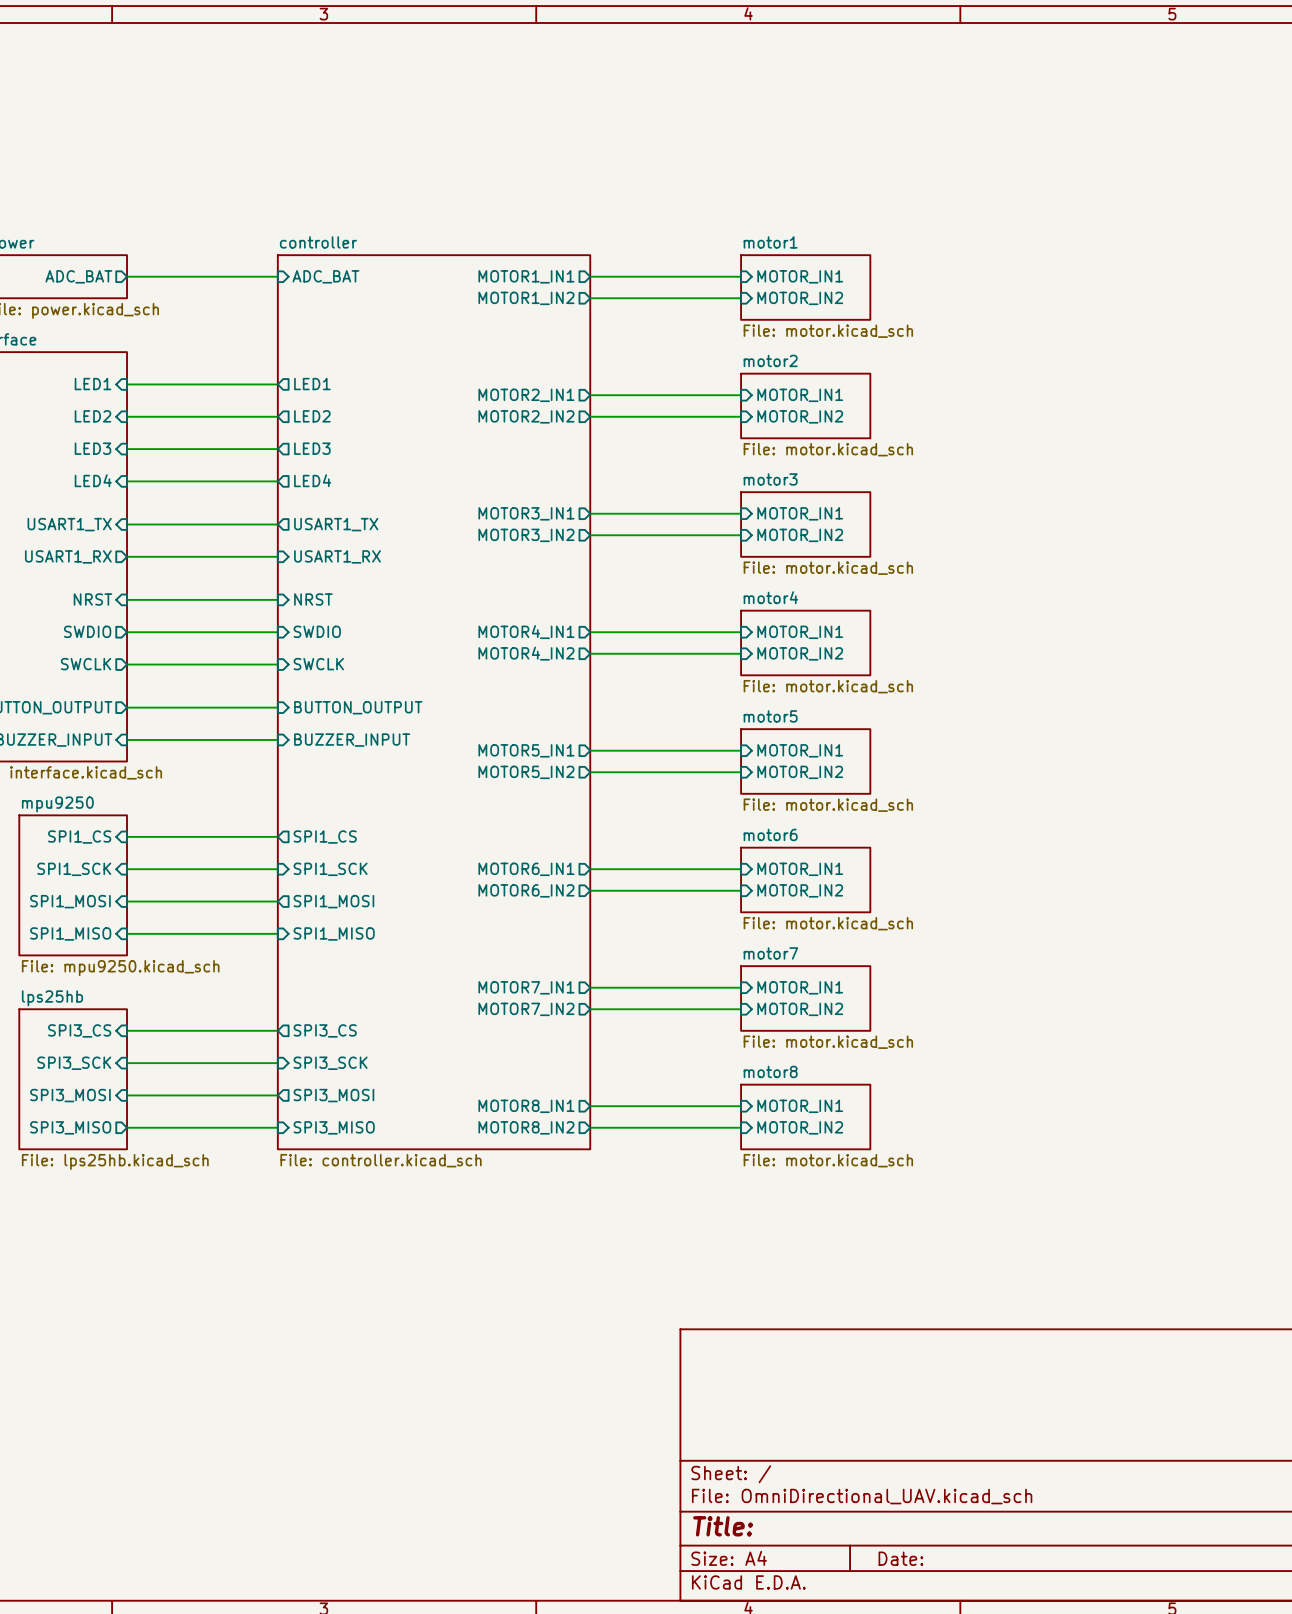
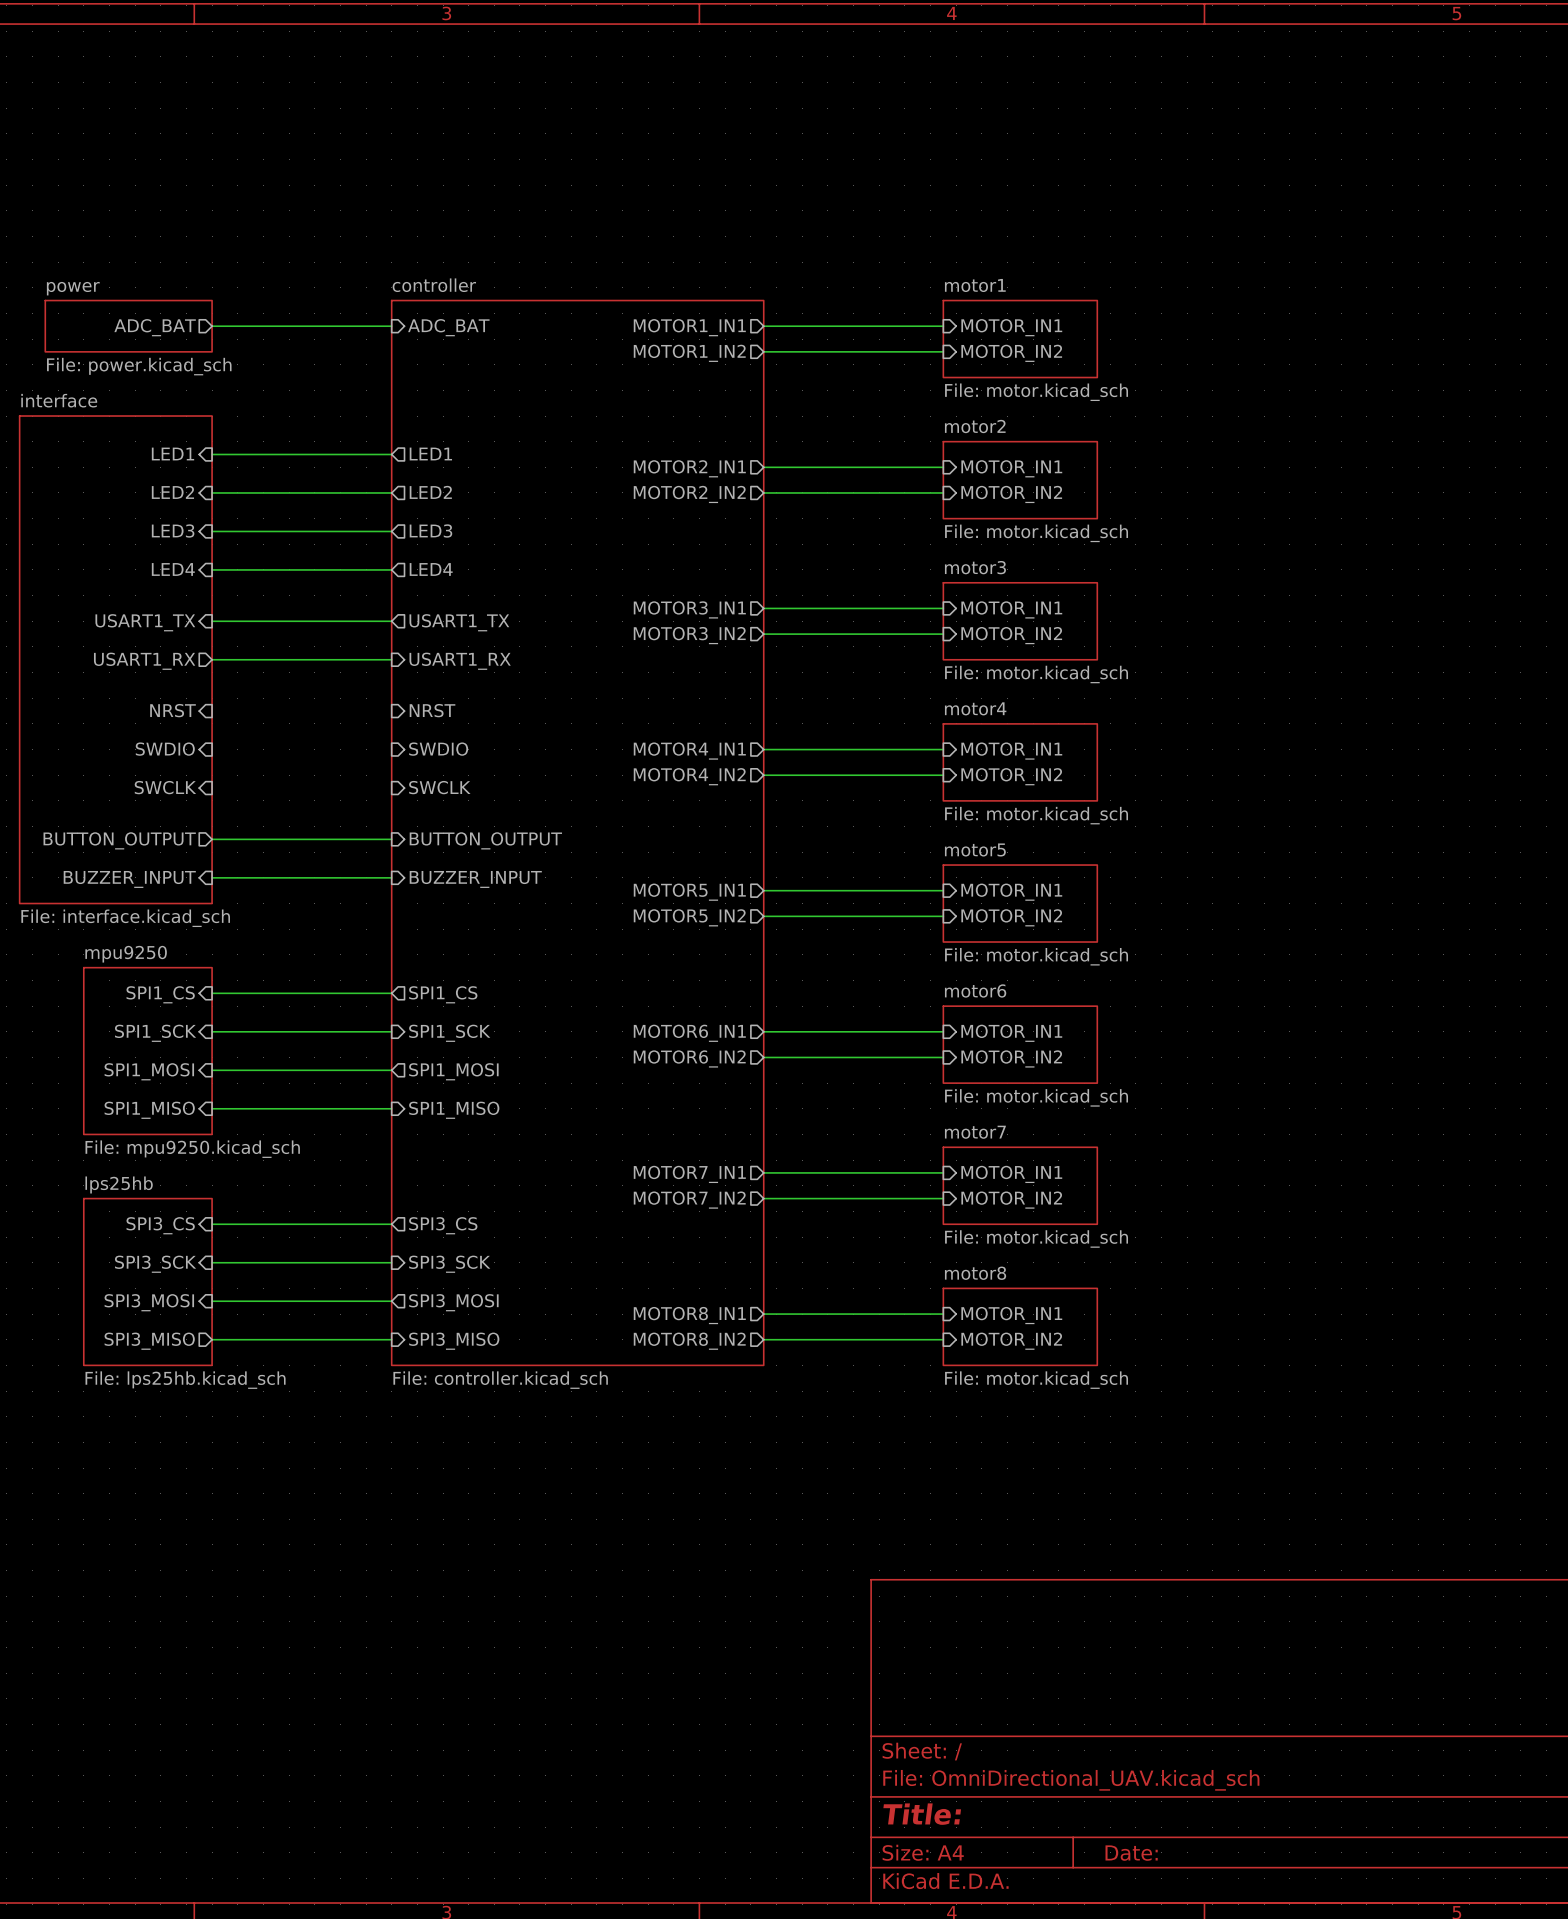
wire: (127, 599) (277, 599) -> none
sheet pin shape: output (87, 631) -> input (165, 749)
wire: (127, 632) (277, 632) -> none
sheet pin shape: output (86, 664) -> input (165, 787)
wire: (127, 664) (277, 664) -> none

